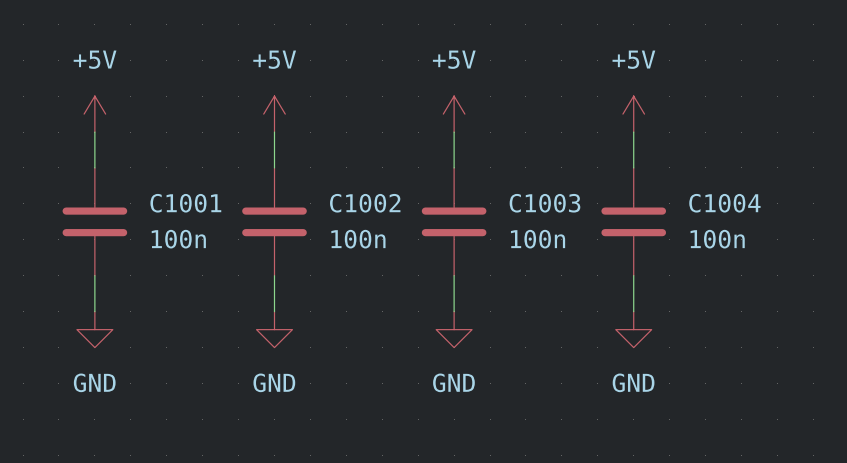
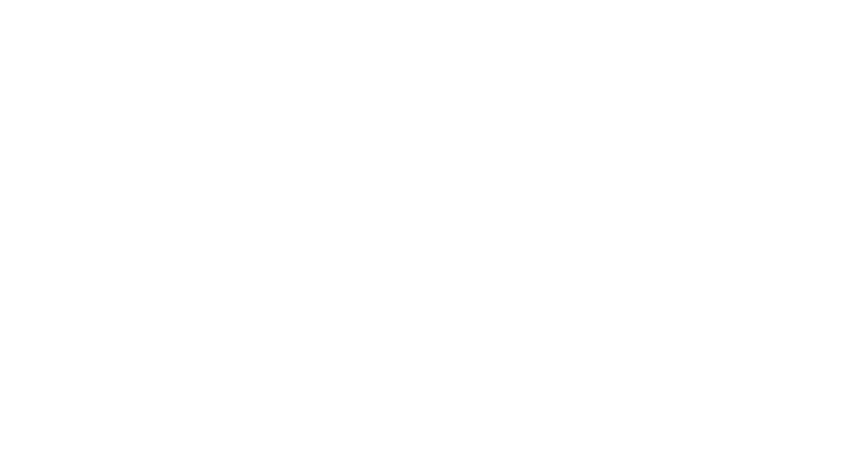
power symbol: +5V (94, 114) -> none
power symbol: +5V (274, 114) -> none
power symbol: +5V (454, 114) -> none
power symbol: +5V (633, 114) -> none
wire: (94, 132) (94, 167) -> none
wire: (274, 132) (274, 167) -> none
wire: (454, 132) (454, 167) -> none
wire: (633, 132) (633, 167) -> none
C1001: 100n (94, 221) -> none
C1002: 100n (274, 221) -> none
C1003: 100n (454, 221) -> none
C1004: 100n (633, 221) -> none
wire: (94, 275) (94, 311) -> none
wire: (274, 275) (274, 311) -> none
wire: (454, 275) (454, 311) -> none
wire: (633, 275) (633, 311) -> none
power symbol: GND (94, 329) -> none
power symbol: GND (274, 329) -> none
power symbol: GND (454, 329) -> none
power symbol: GND (633, 329) -> none

